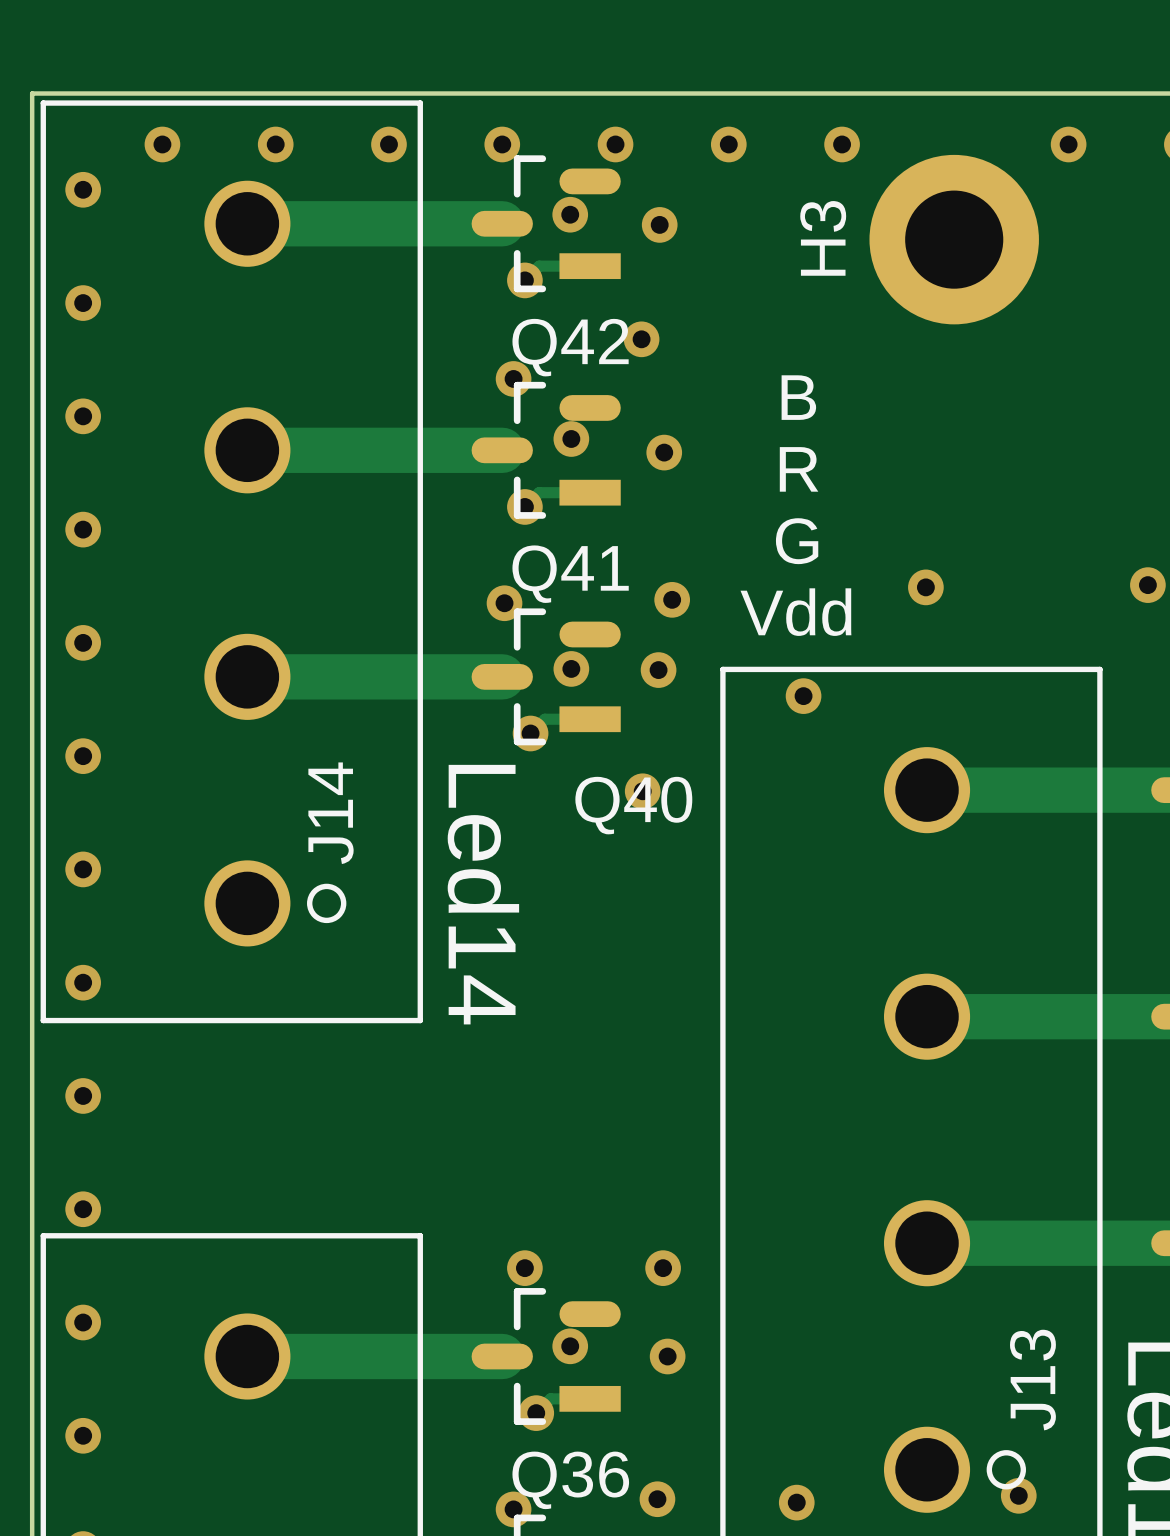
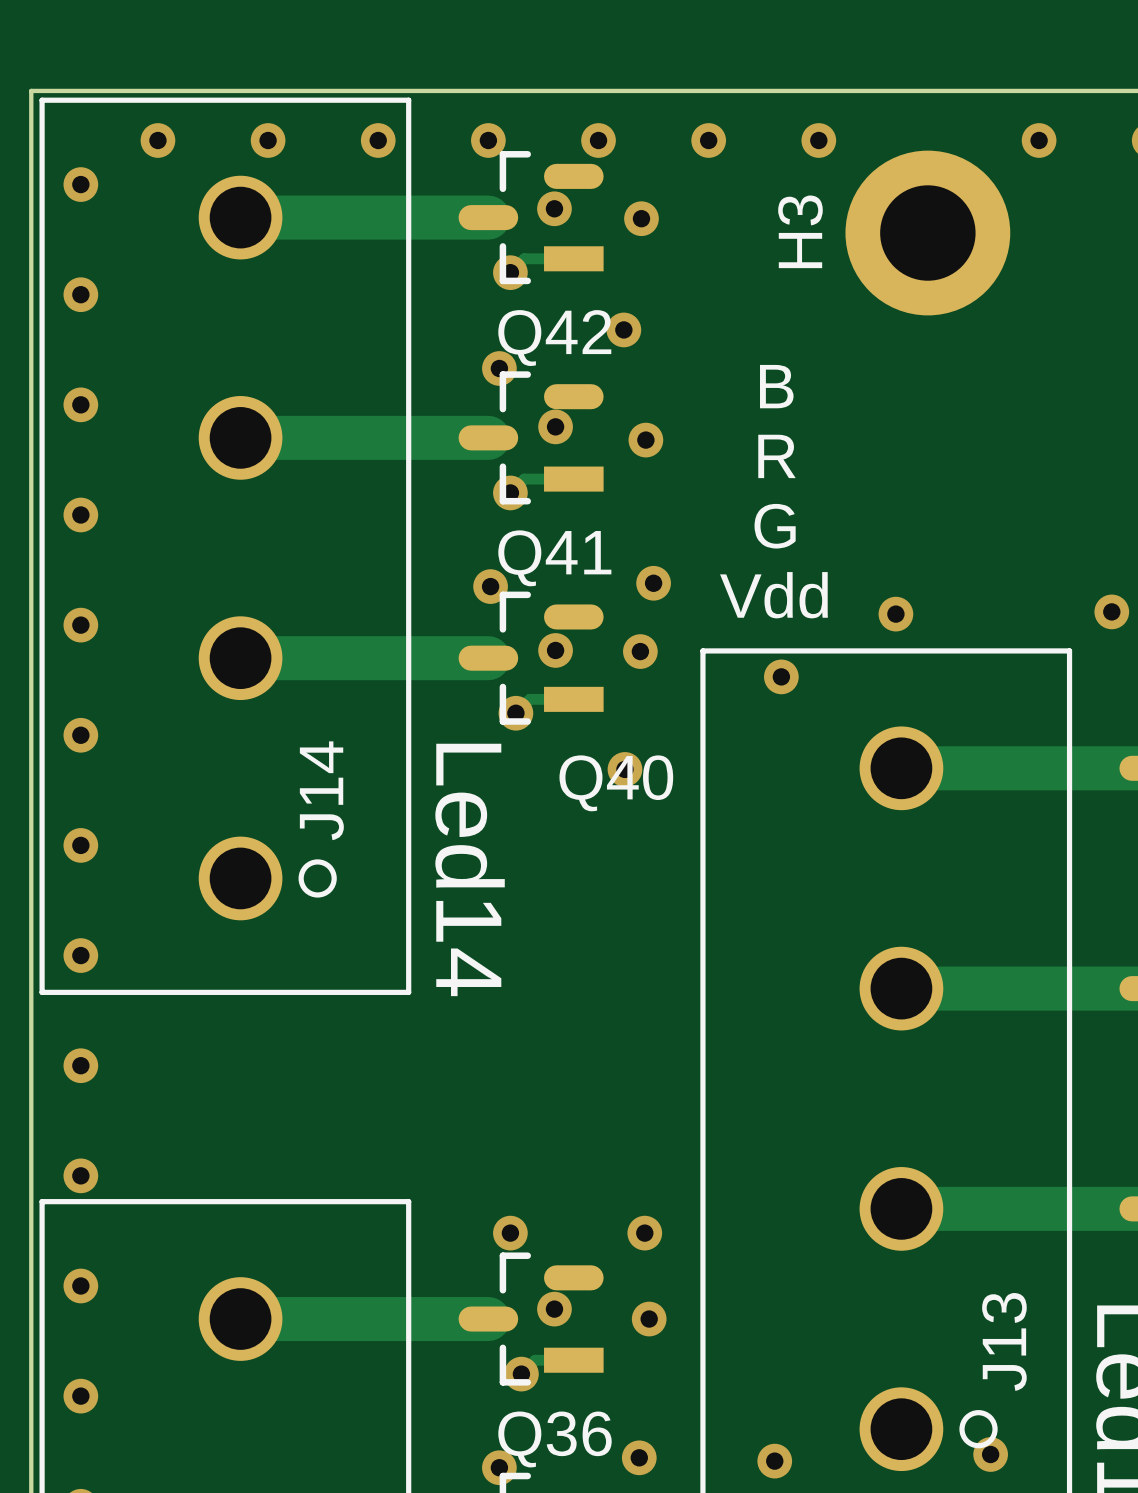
via position: (1147, 585) -> (1111, 611)
via position: (925, 587) -> (895, 614)

